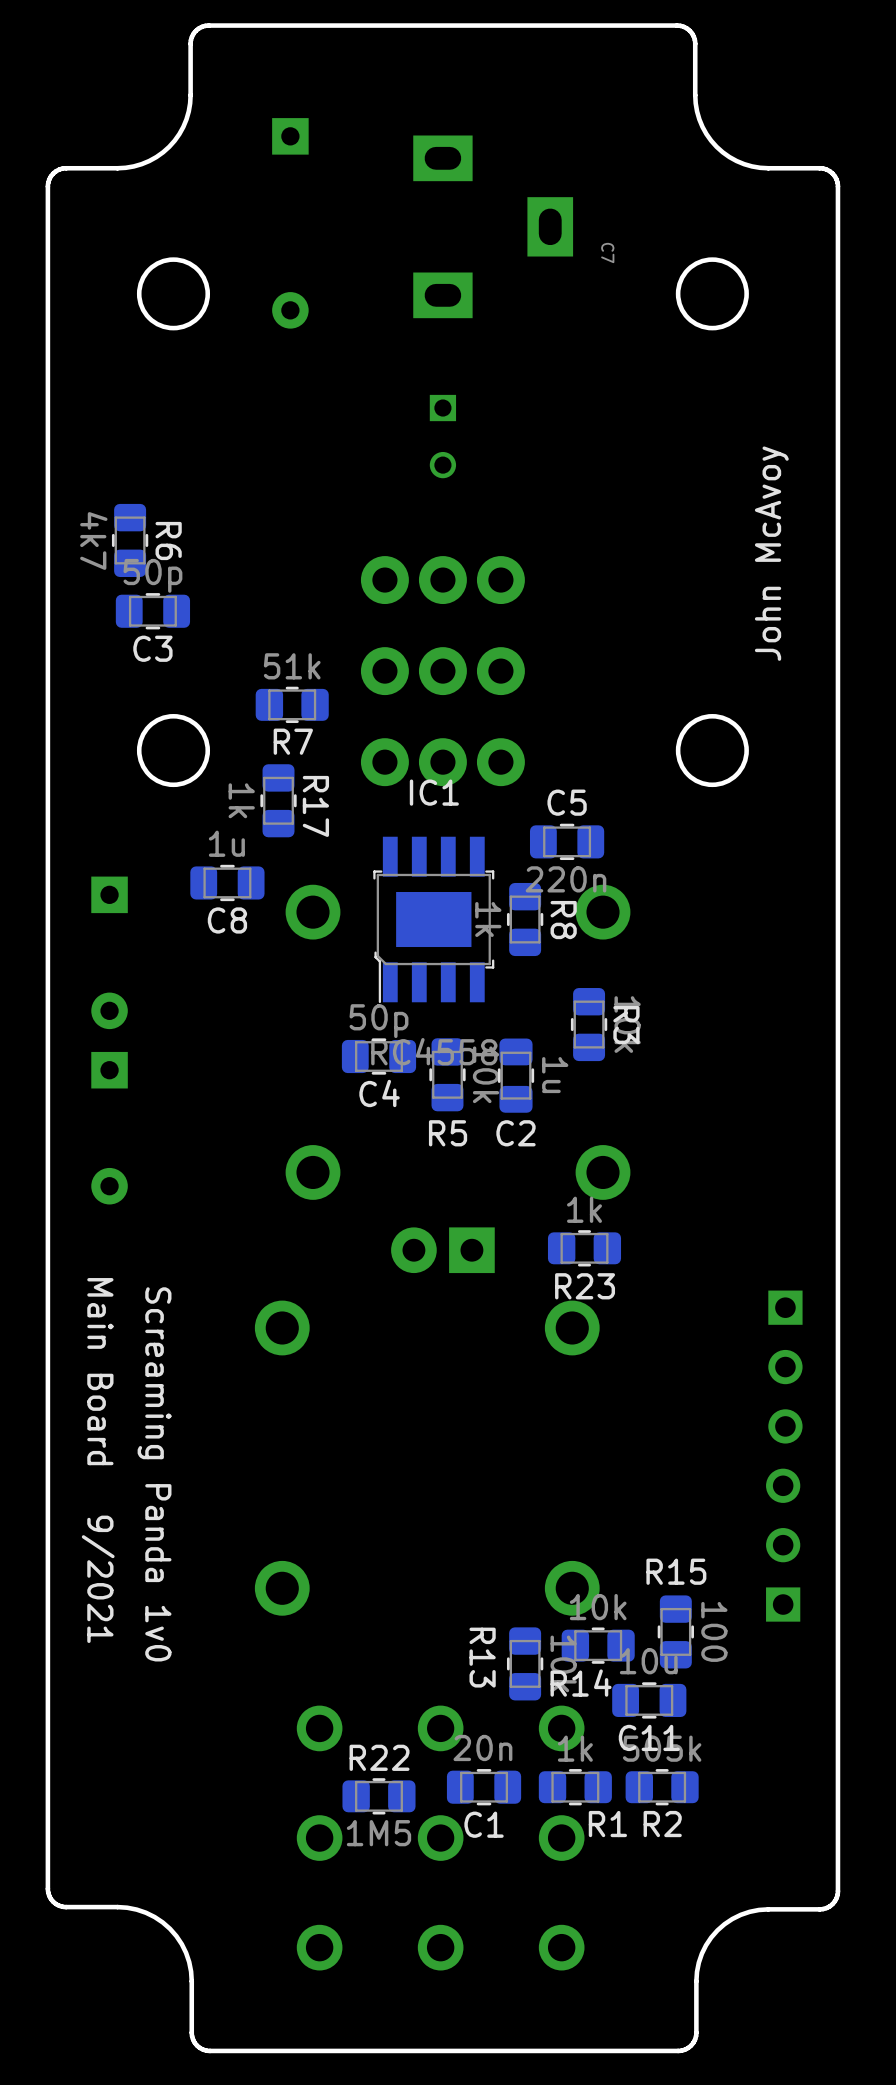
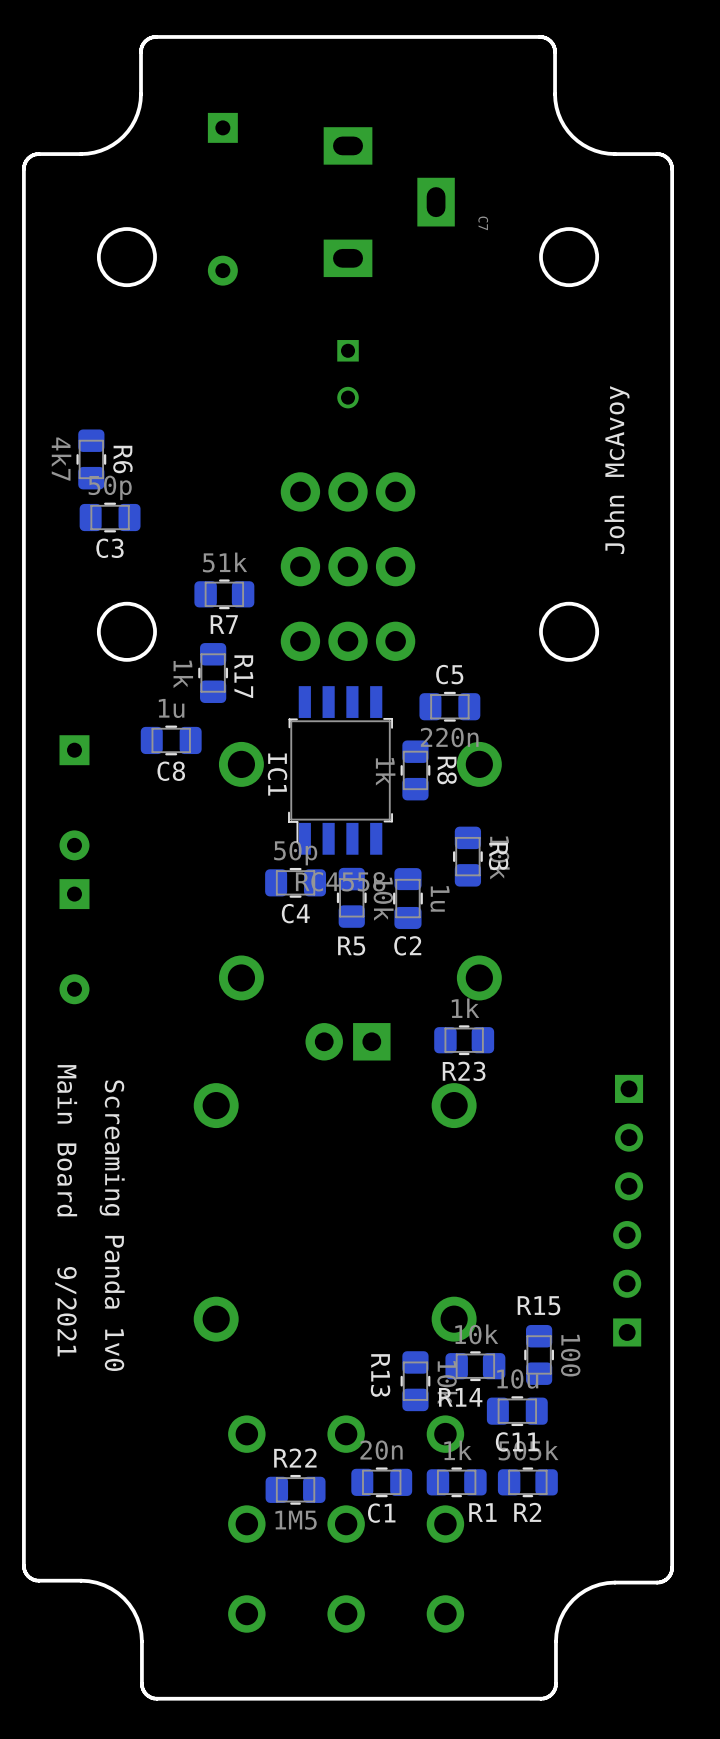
IC1 name position: IC1 (434, 792) -> IC1 (277, 774)
IC1 footprint: [373, 836, 495, 1004] -> [288, 686, 393, 855]

